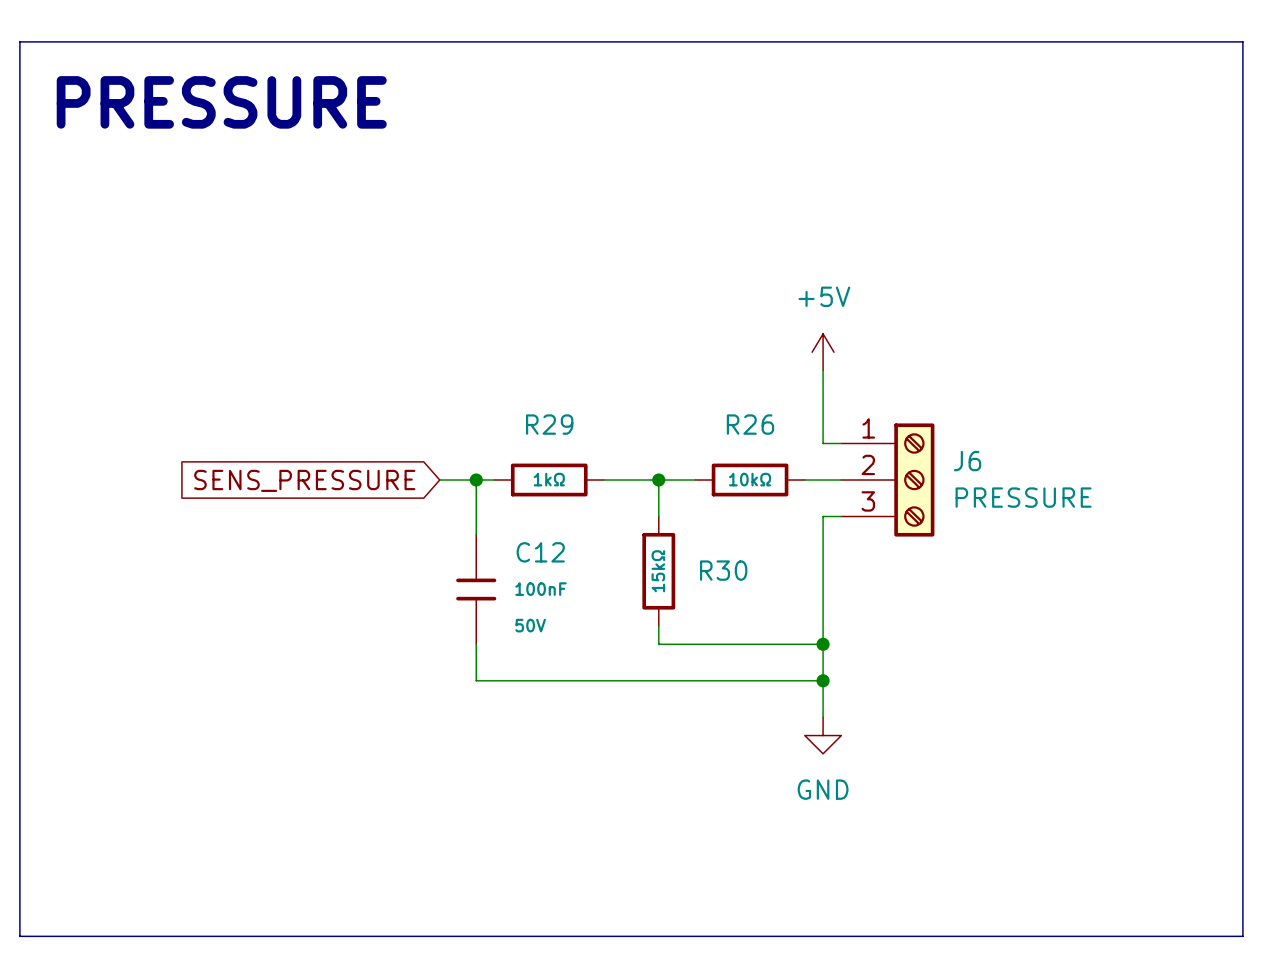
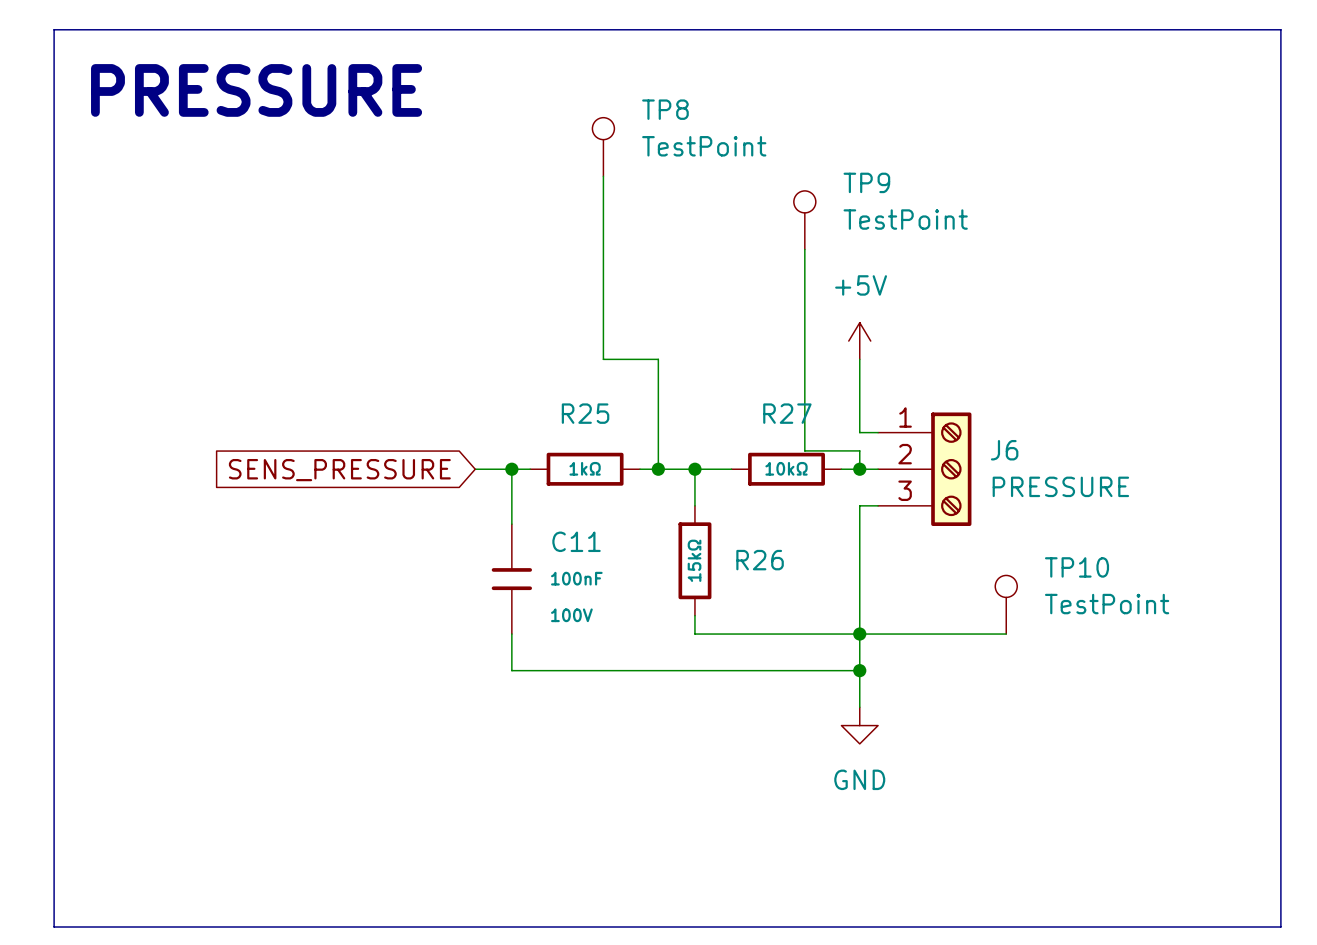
TP8: none -> TestPoint (603, 146)
wire: none -> (603, 176) (603, 359) (658, 359) (658, 469)
TP9: none -> TestPoint (804, 220)
wire: none -> (804, 249) (804, 450) (859, 450) (859, 469)
R29 name: R29 (549, 424) -> R25 (585, 413)
R26 name: R26 (750, 424) -> R27 (787, 413)
junction: none -> (658, 469)
junction: none -> (859, 469)
C12 name: C12 (540, 552) -> C11 (576, 541)
R30 name: R30 (723, 570) -> R26 (760, 560)
TP10: none -> TestPoint (1006, 604)
C12 text: 50V (530, 625) -> 100V (571, 615)
wire: none -> (859, 634) (1006, 634)

